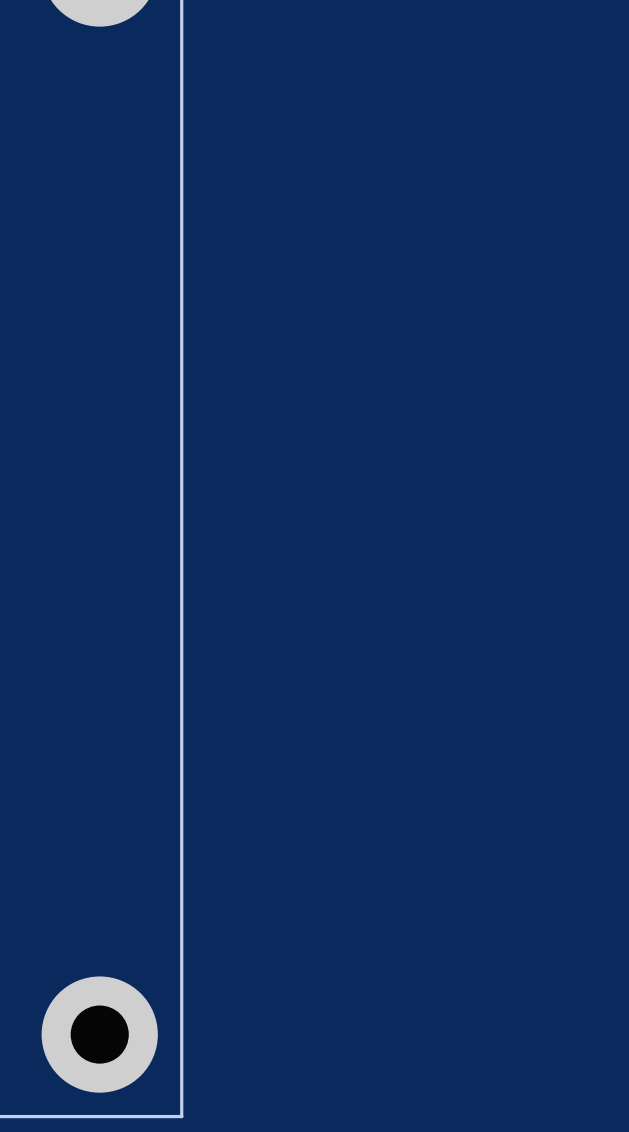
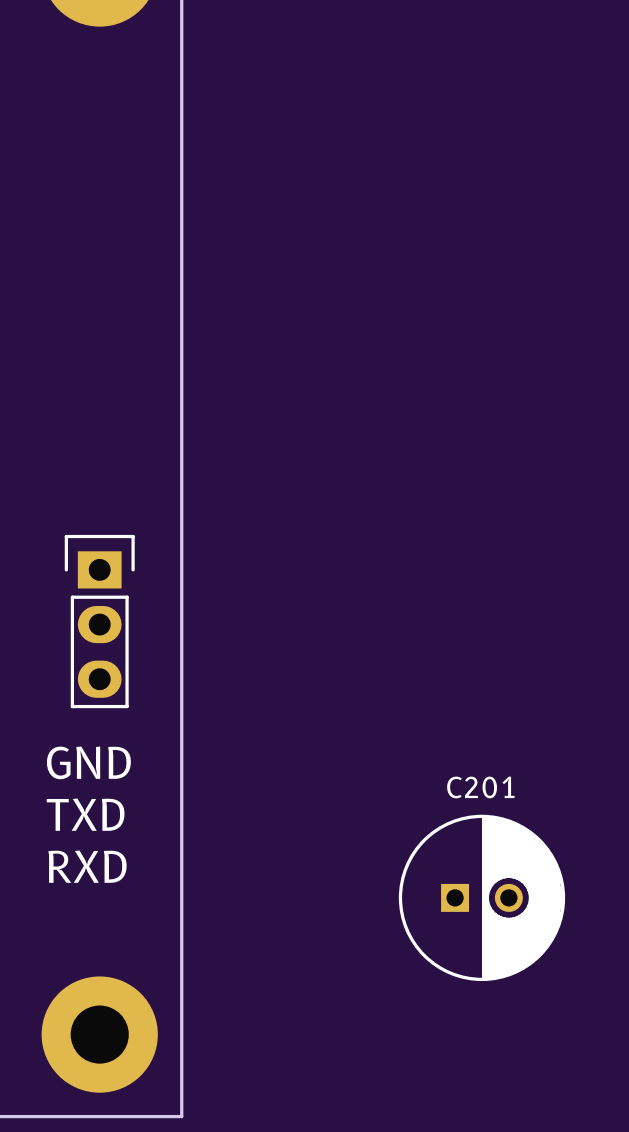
part: none -> (99, 621)
text: none -> GND (88, 762)
text: none -> TXD (85, 814)
text: none -> RXD (87, 866)
C201: none -> (481, 897)

